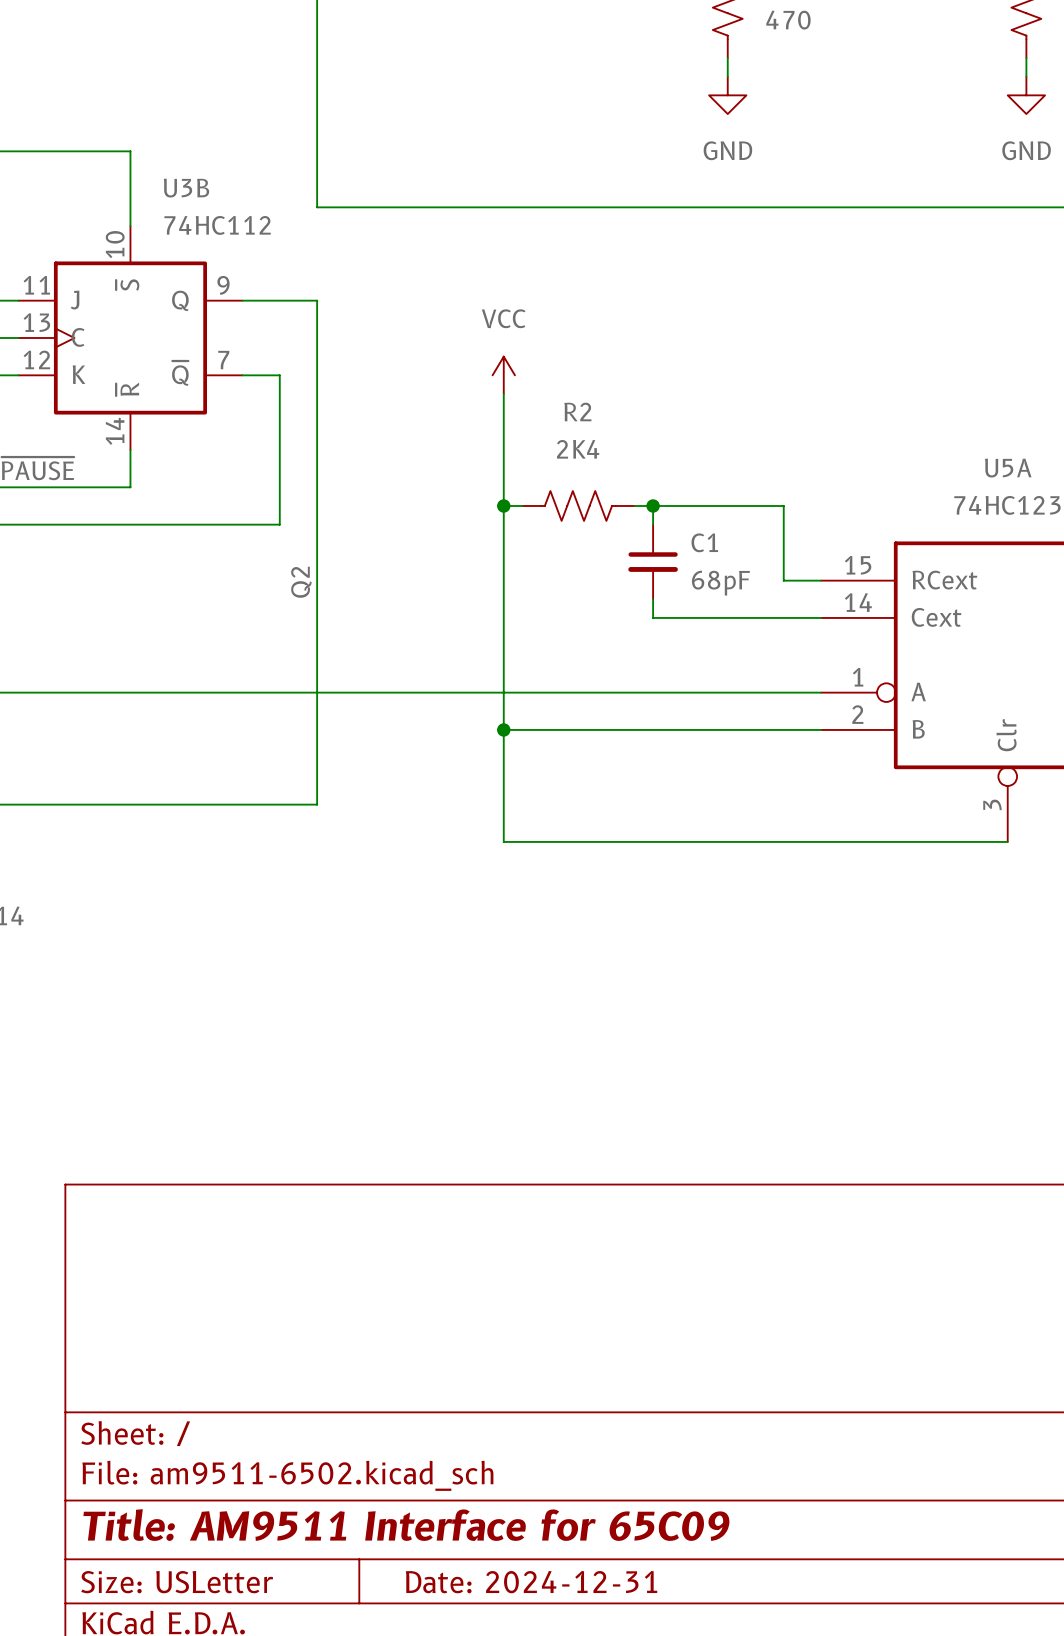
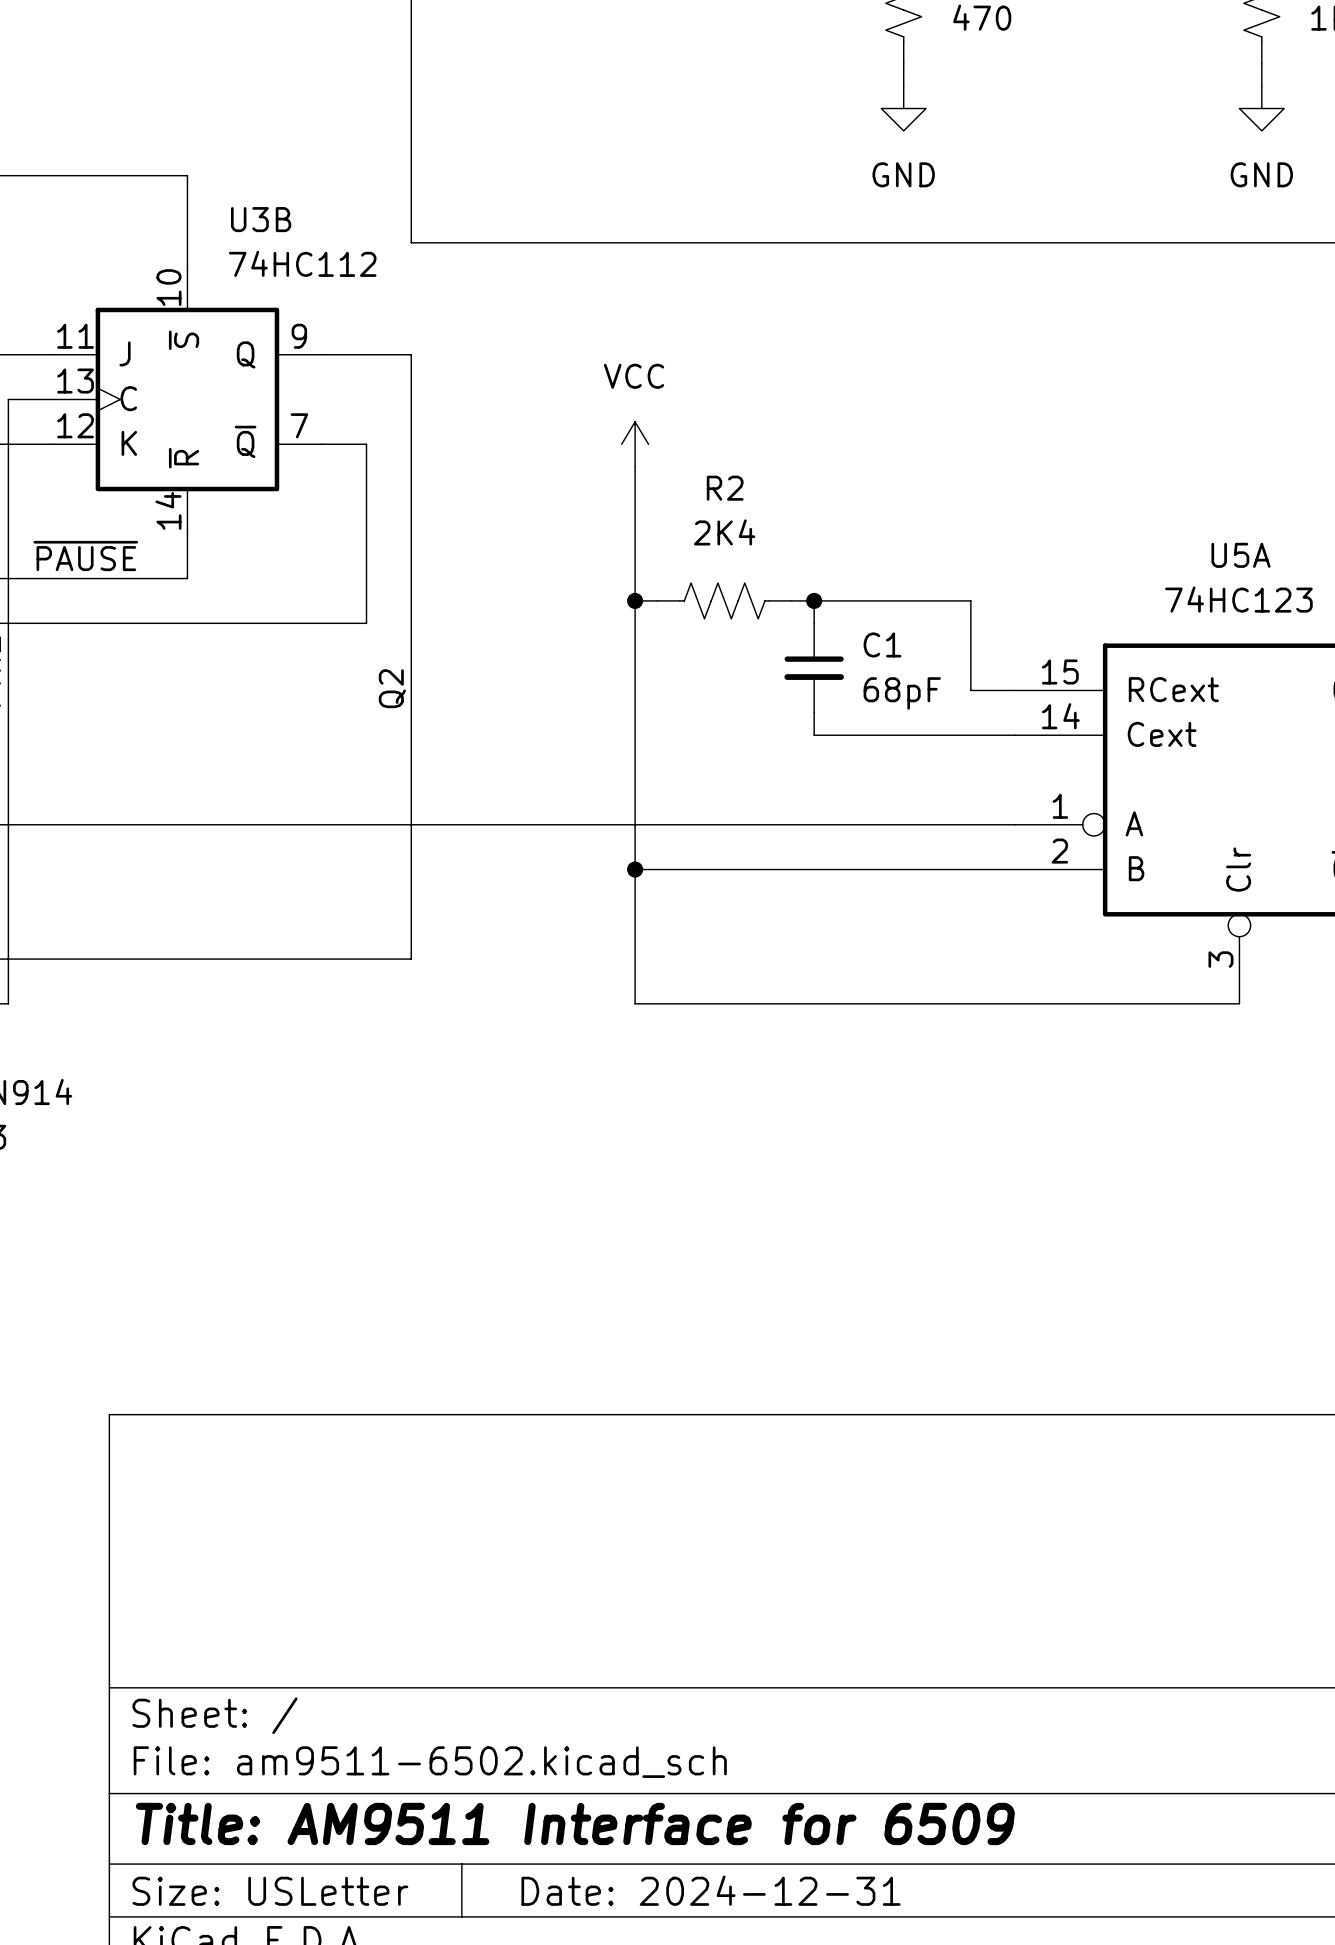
title block: Title: AM9511 Interface for 65C09 (406, 1525) -> Title: AM9511 Interface for 6509 (575, 1823)

